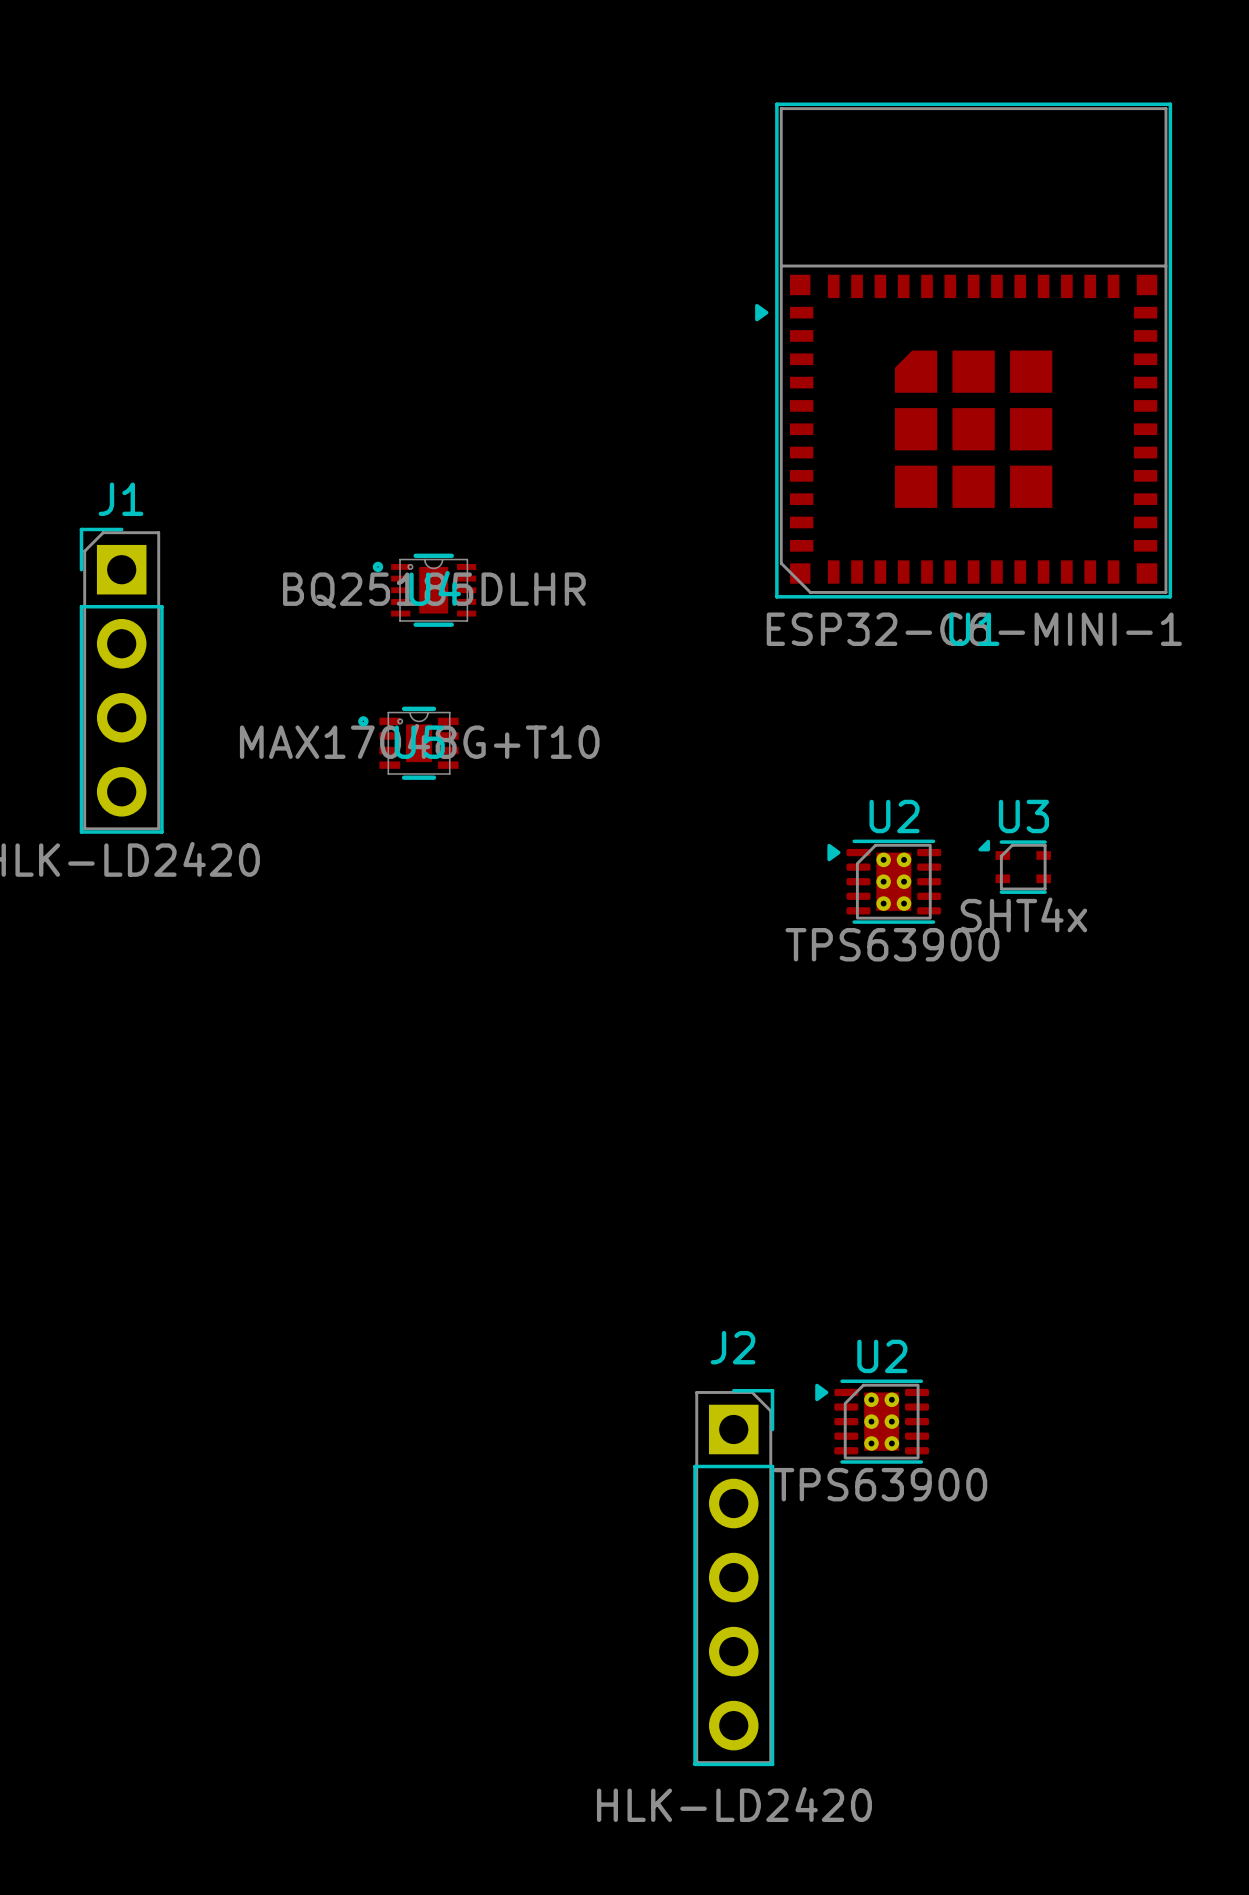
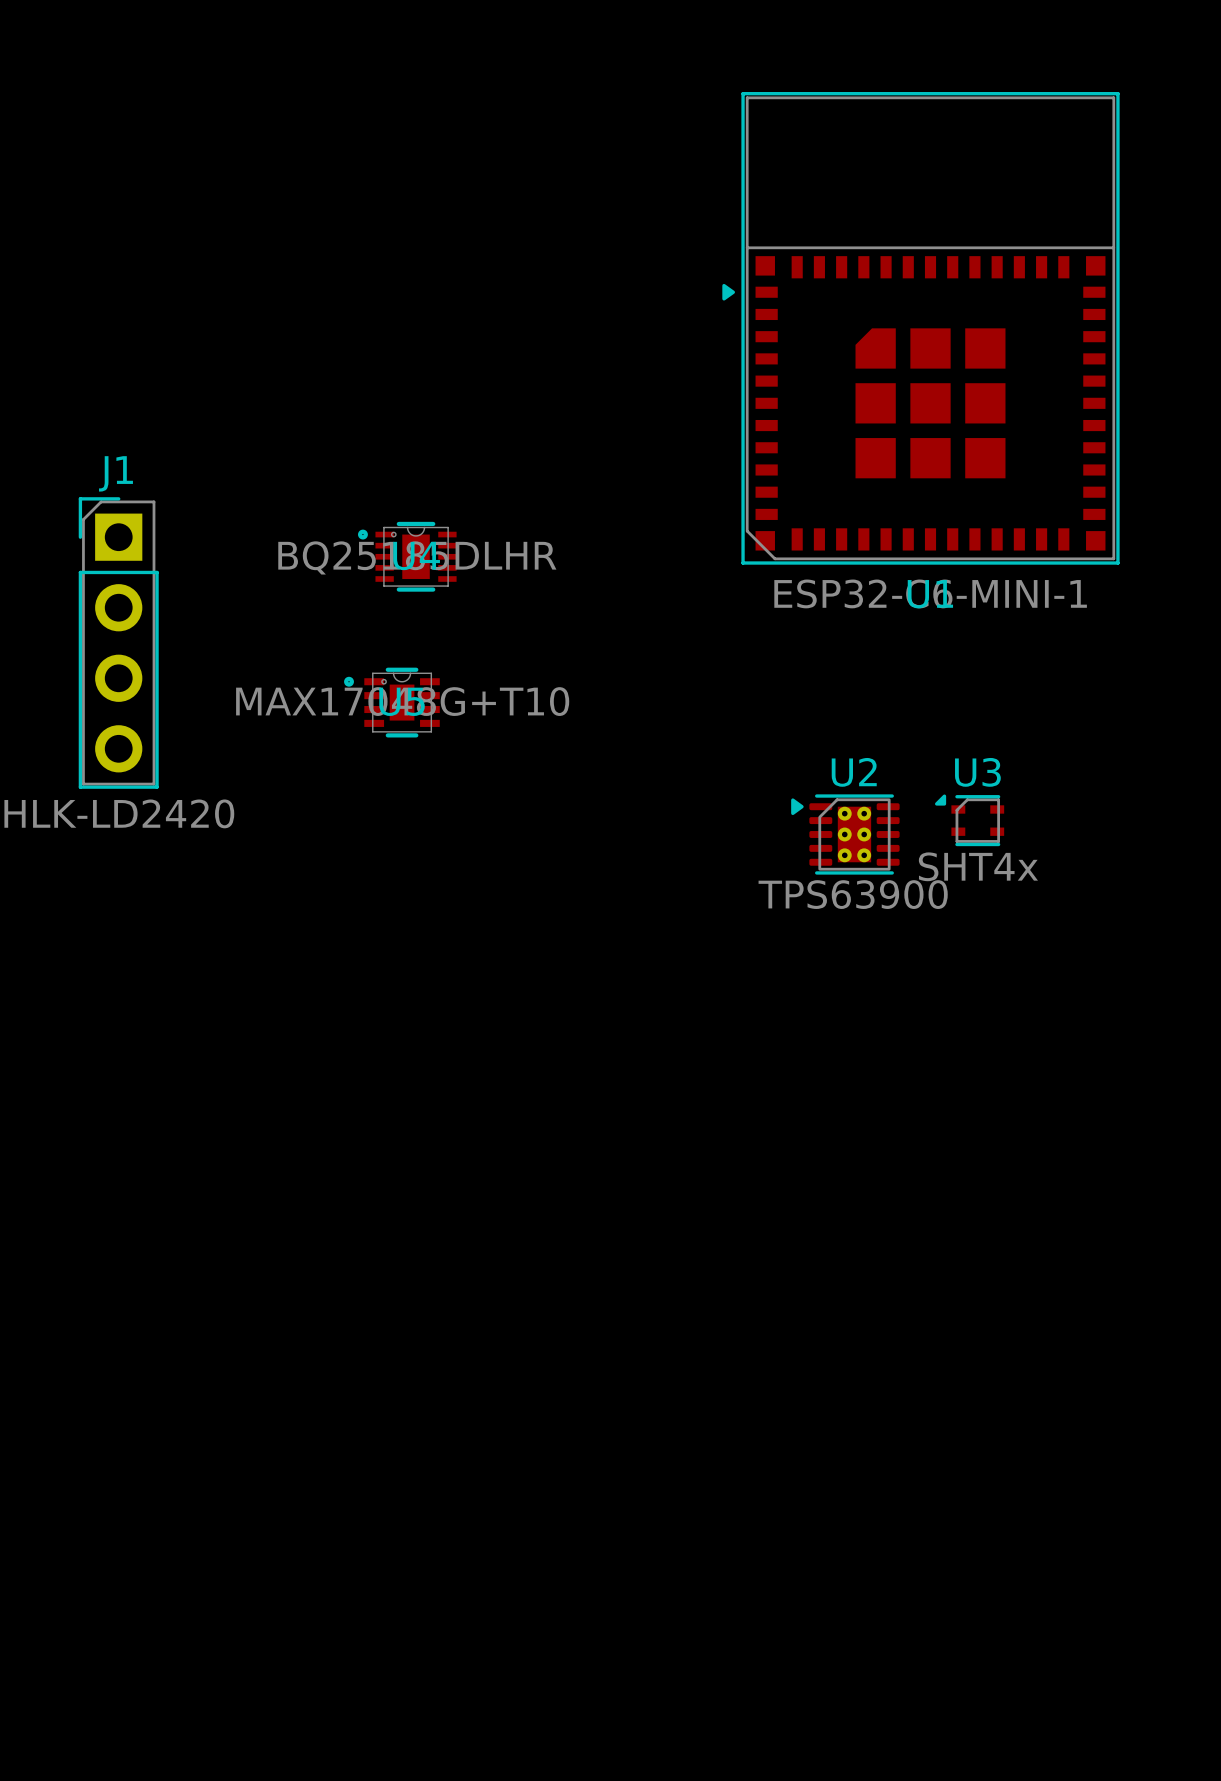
U2: TPS63900 (872, 1421) -> none
J2: HLK-LD2420 (733, 1577) -> none

